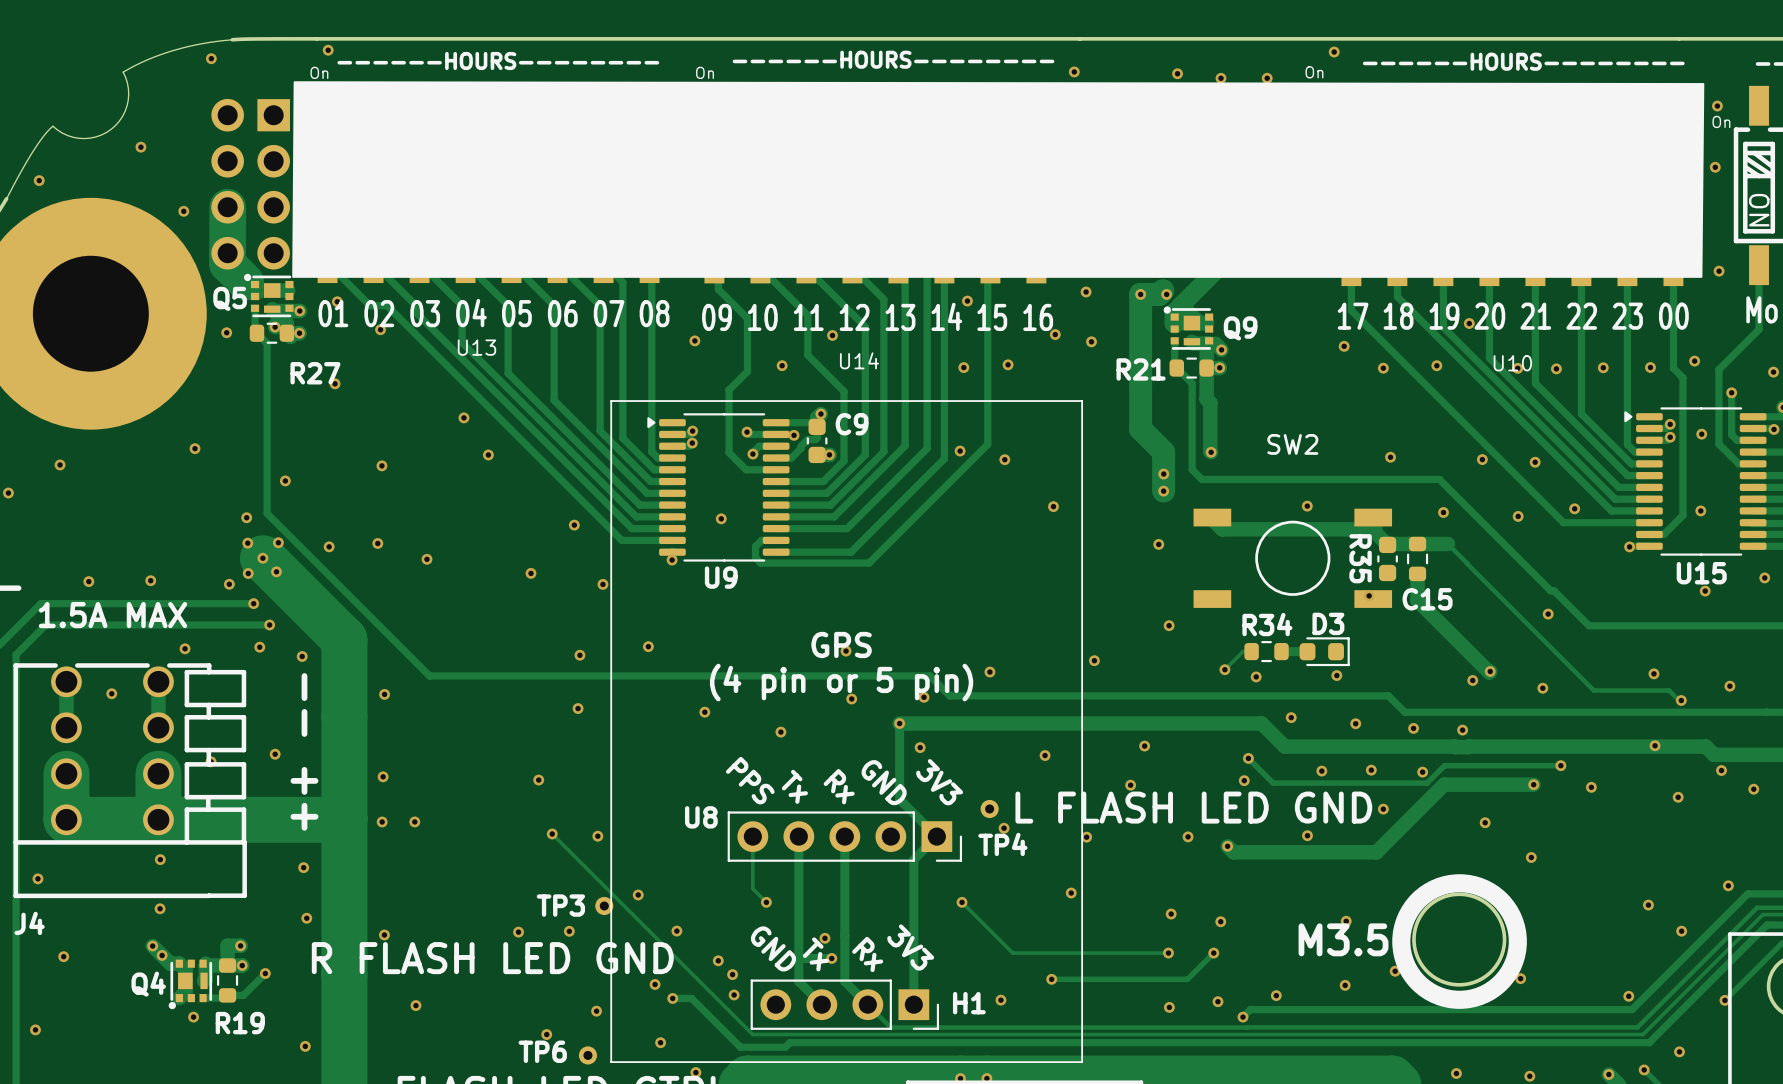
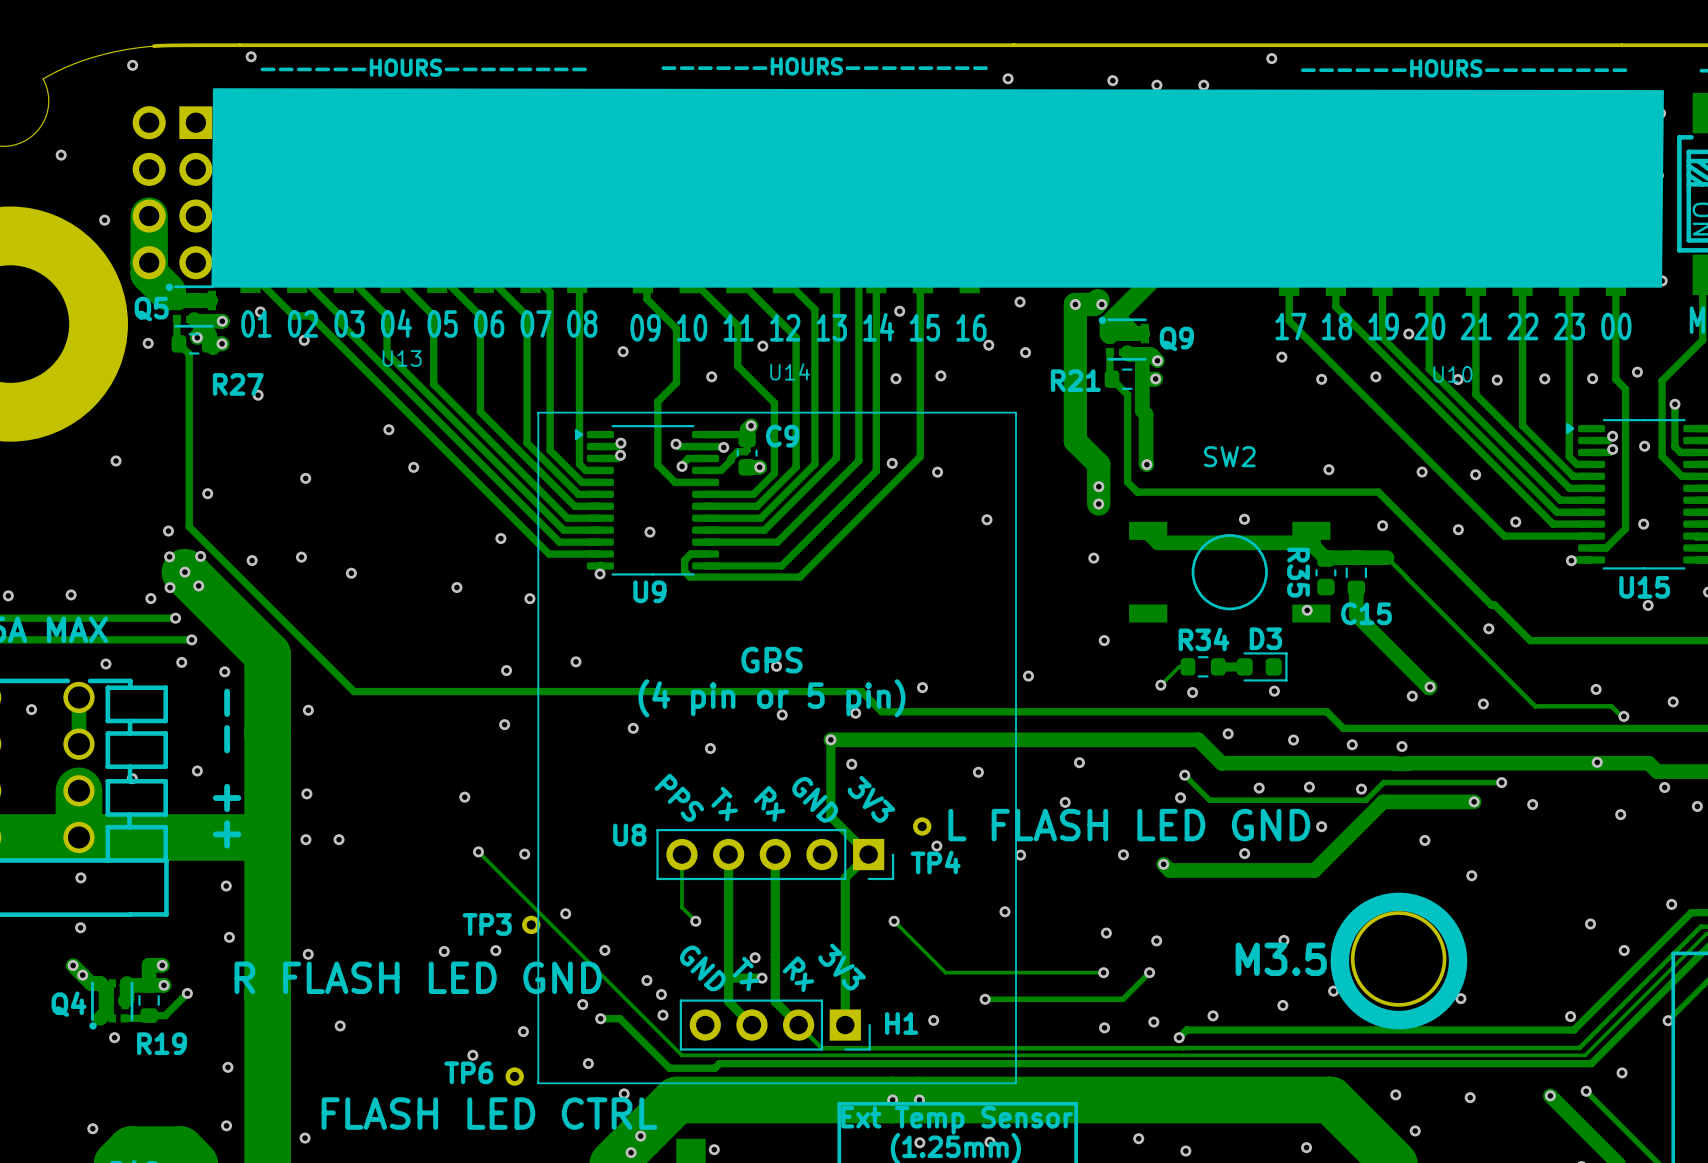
text: On (319, 72) -> none
text: On (705, 72) -> none
text: On (1314, 72) -> none
drawing shape: [292, 81, 1705, 278] -> [211, 88, 1664, 288]
text: On (1721, 121) -> none

